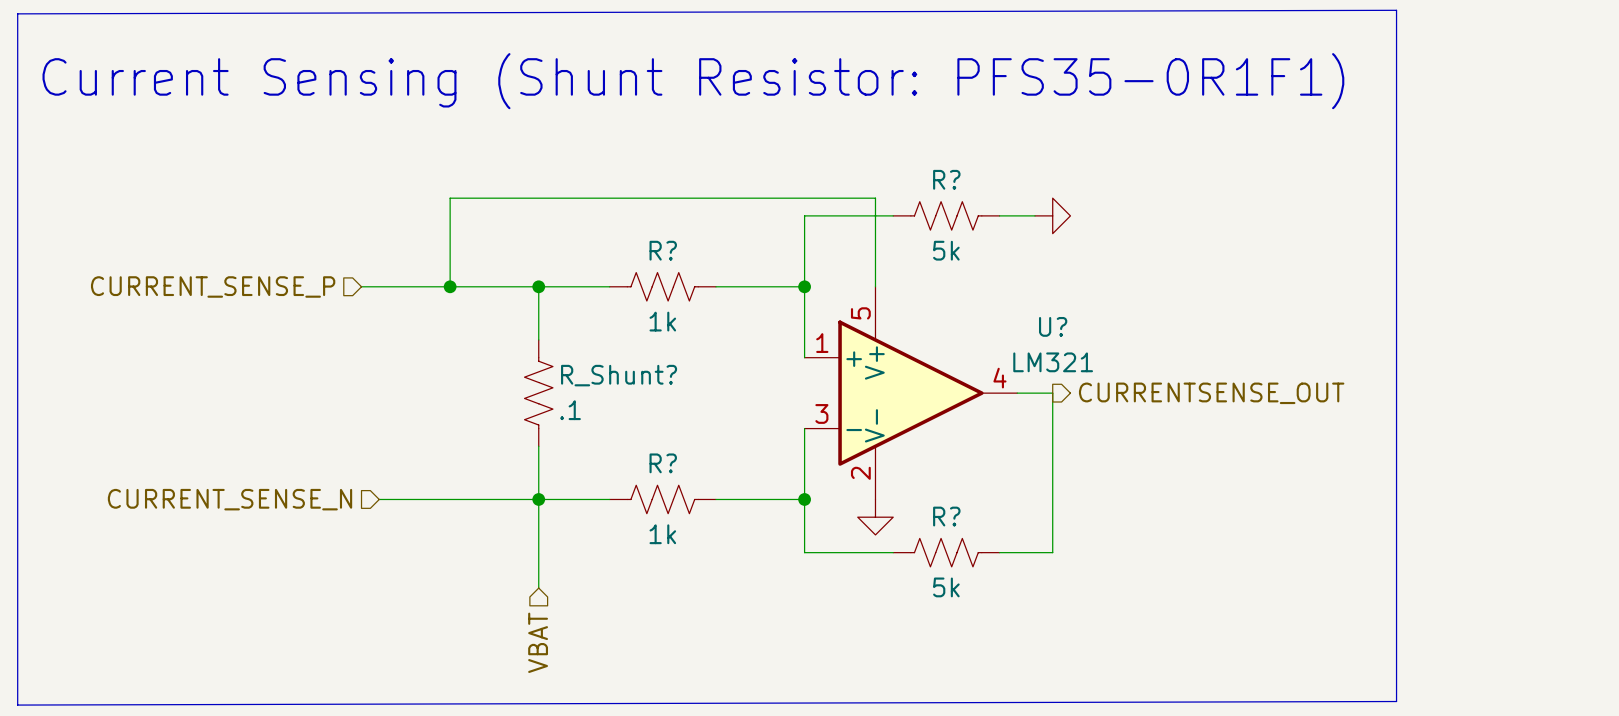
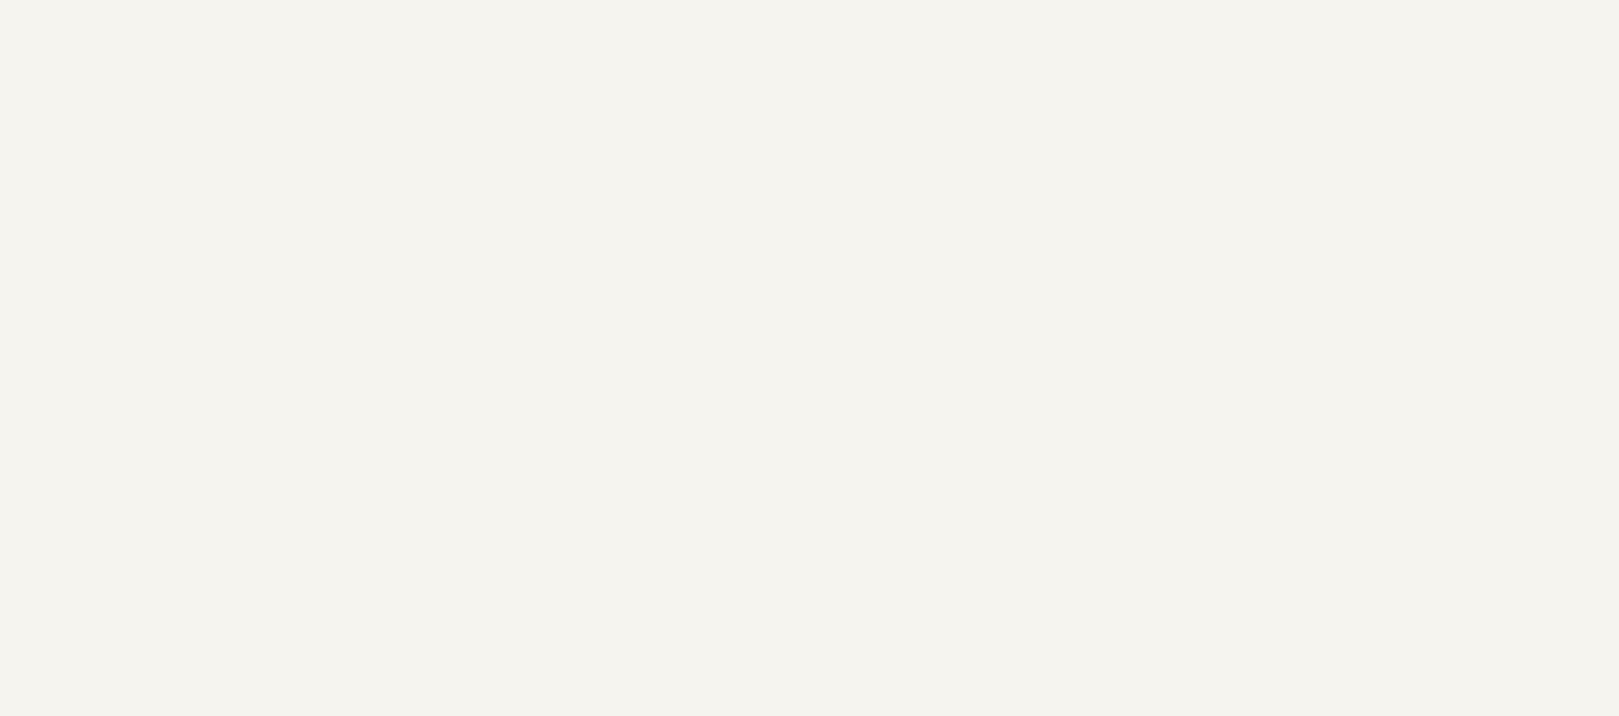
line: (1396, 10) (1396, 701) (17, 705) (17, 13) (1396, 10) -> none
text: Current Sensing (Shunt Resistor: PFS35-0R1F1) (693, 81) -> none
wire: (893, 215) (804, 215) (804, 357) -> none
R?: 5k (946, 215) -> none
wire: (999, 215) (1034, 215) -> none
power symbol: (1052, 215) -> none
hierarchical label: CURRENT_SENSE_P (213, 286) -> none
wire: (361, 286) (609, 286) -> none
wire: (450, 286) (450, 198) (875, 198) (875, 286) -> none
junction: (450, 286) -> none
wire: (538, 286) (538, 339) -> none
junction: (538, 286) -> none
R?: 1k (662, 286) -> none
wire: (715, 286) (804, 286) -> none
junction: (804, 286) -> none
R_Shunt?: .1 (538, 393) -> none
U?: LM321 (910, 393) -> none
wire: (1017, 393) (1052, 393) (1052, 552) (999, 552) -> none
hierarchical label: CURRENTSENSE_OUT (1211, 393) -> none
wire: (804, 428) (804, 552) (893, 552) -> none
wire: (538, 446) (538, 588) -> none
hierarchical label: CURRENT_SENSE_N (230, 499) -> none
wire: (379, 499) (609, 499) -> none
junction: (538, 499) -> none
R?: 1k (662, 499) -> none
wire: (715, 499) (804, 499) -> none
junction: (804, 499) -> none
power symbol: (875, 517) -> none
R?: 5k (946, 552) -> none
hierarchical label: VBAT (538, 642) -> none

